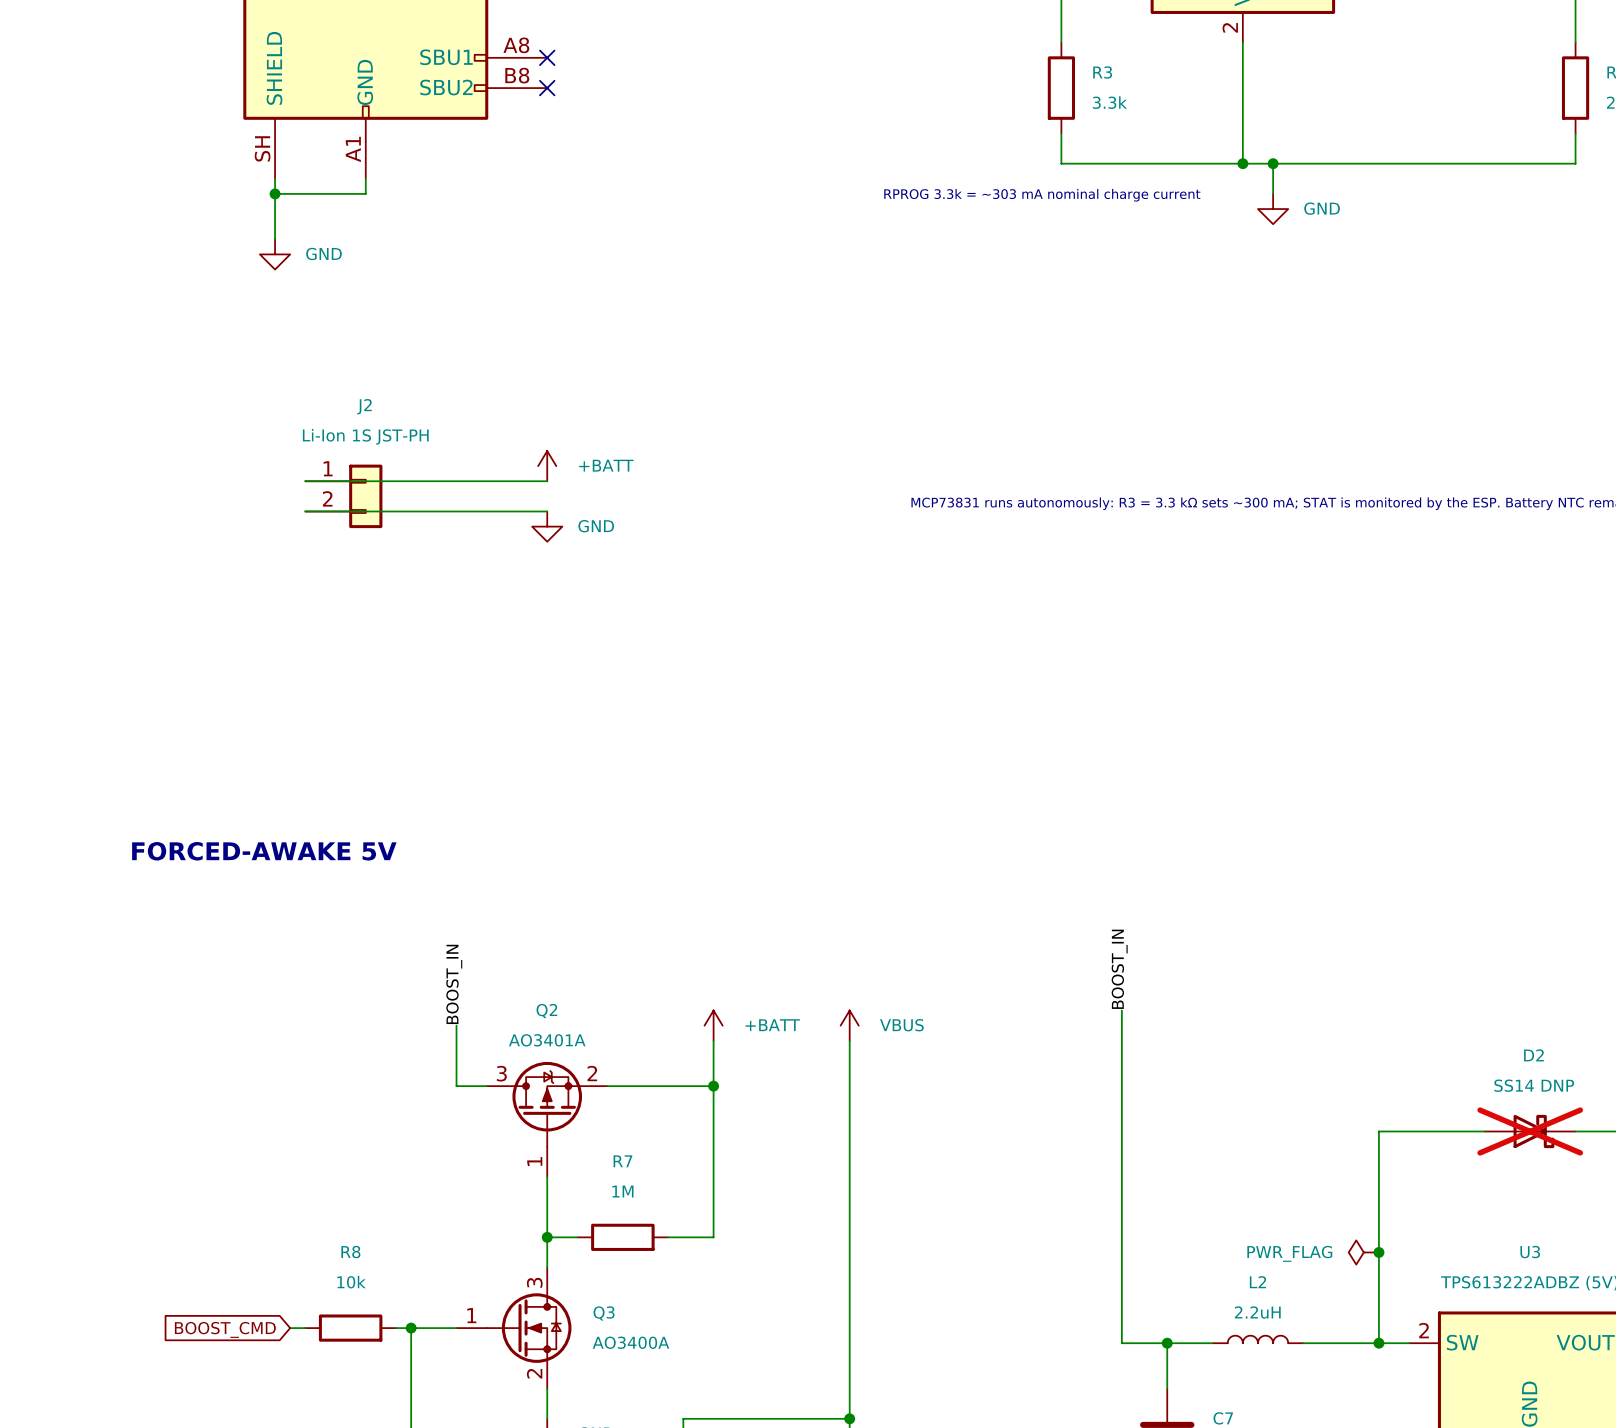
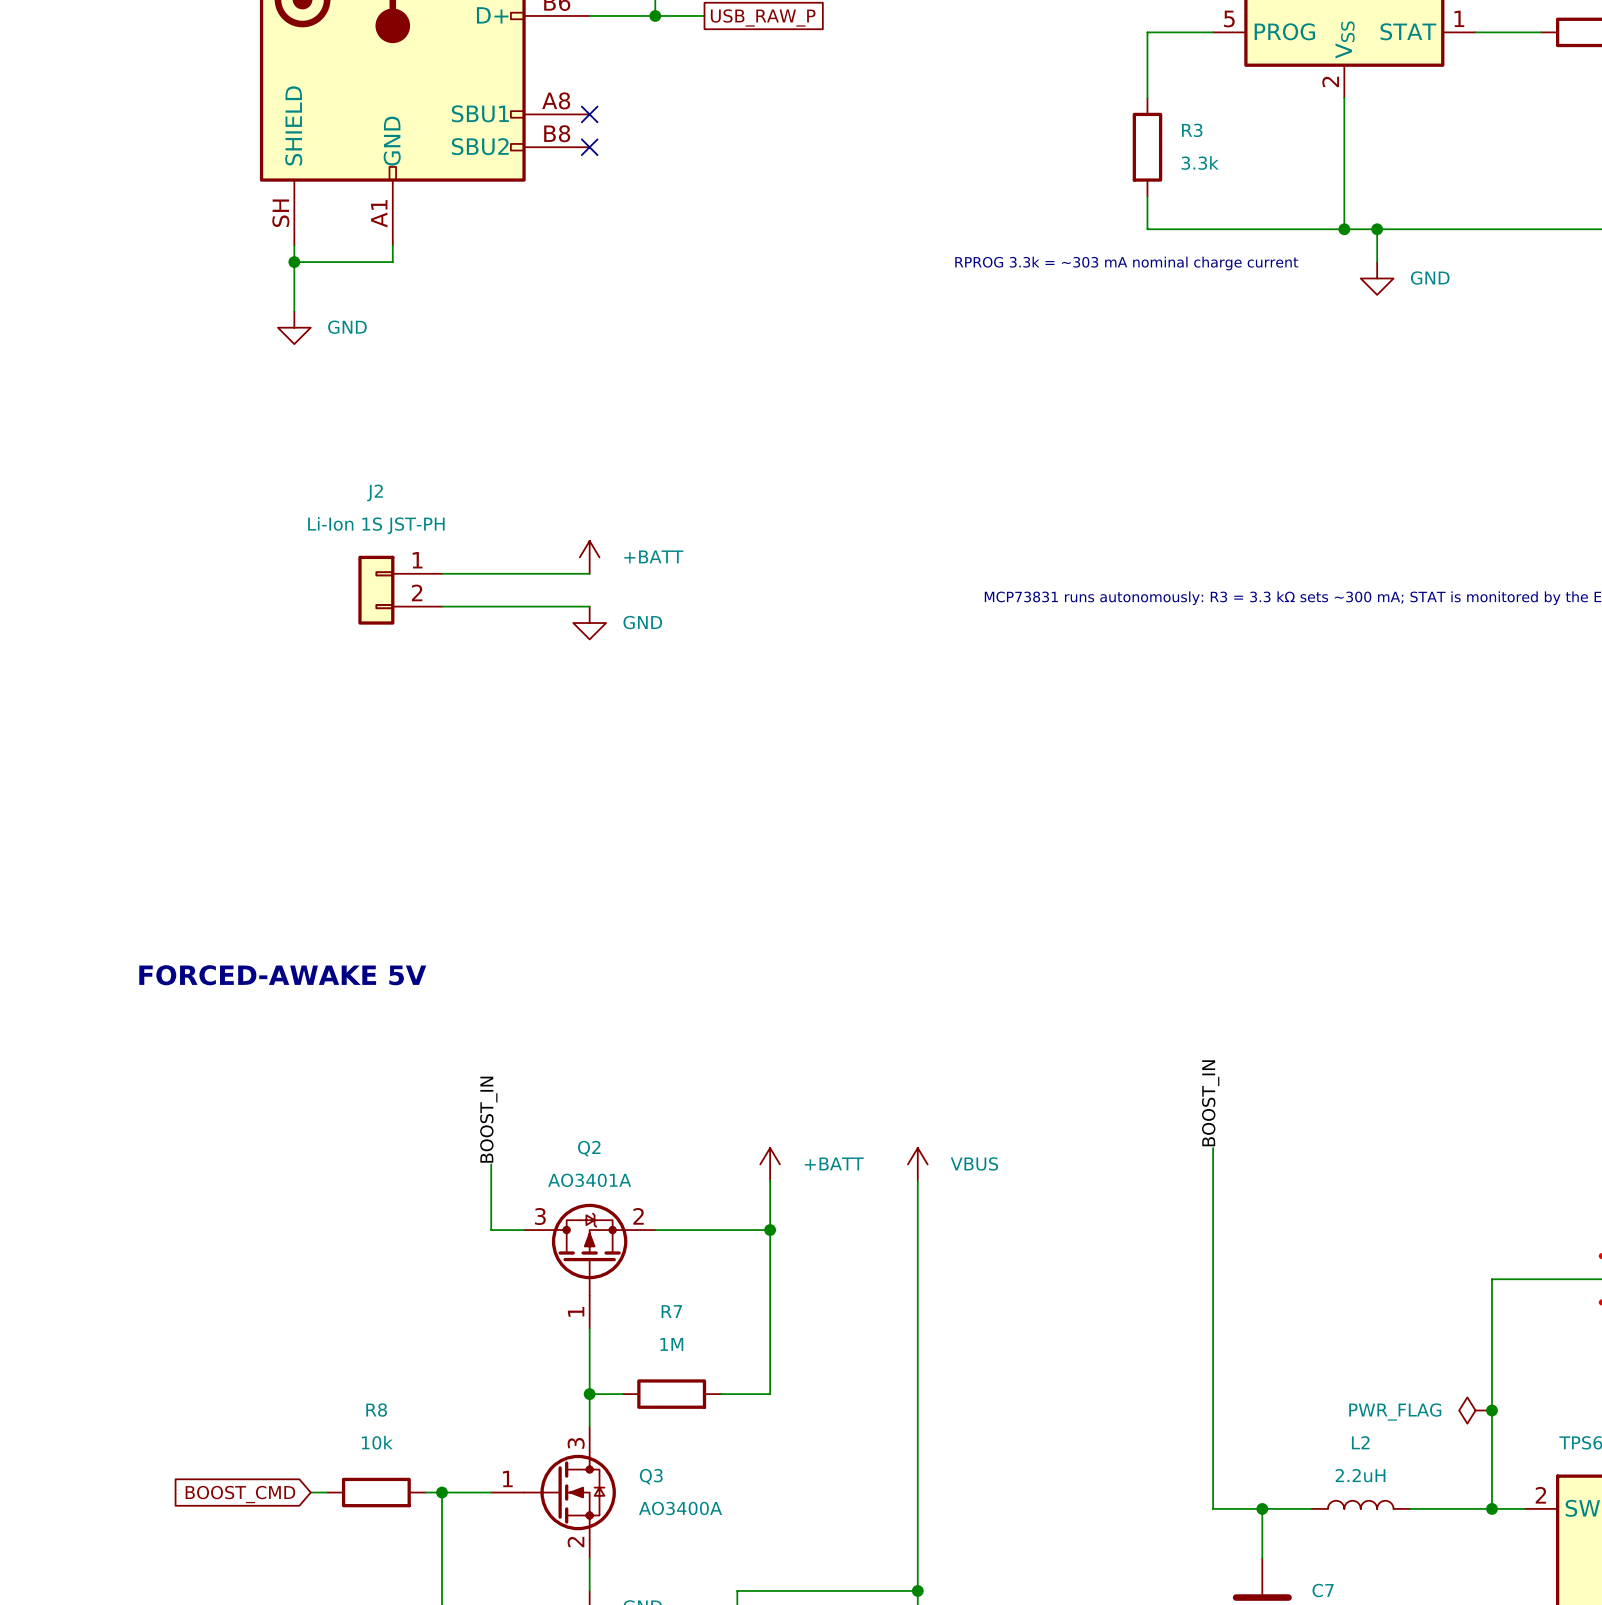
J2 flip: as is (365, 496) -> left-right (376, 590)

